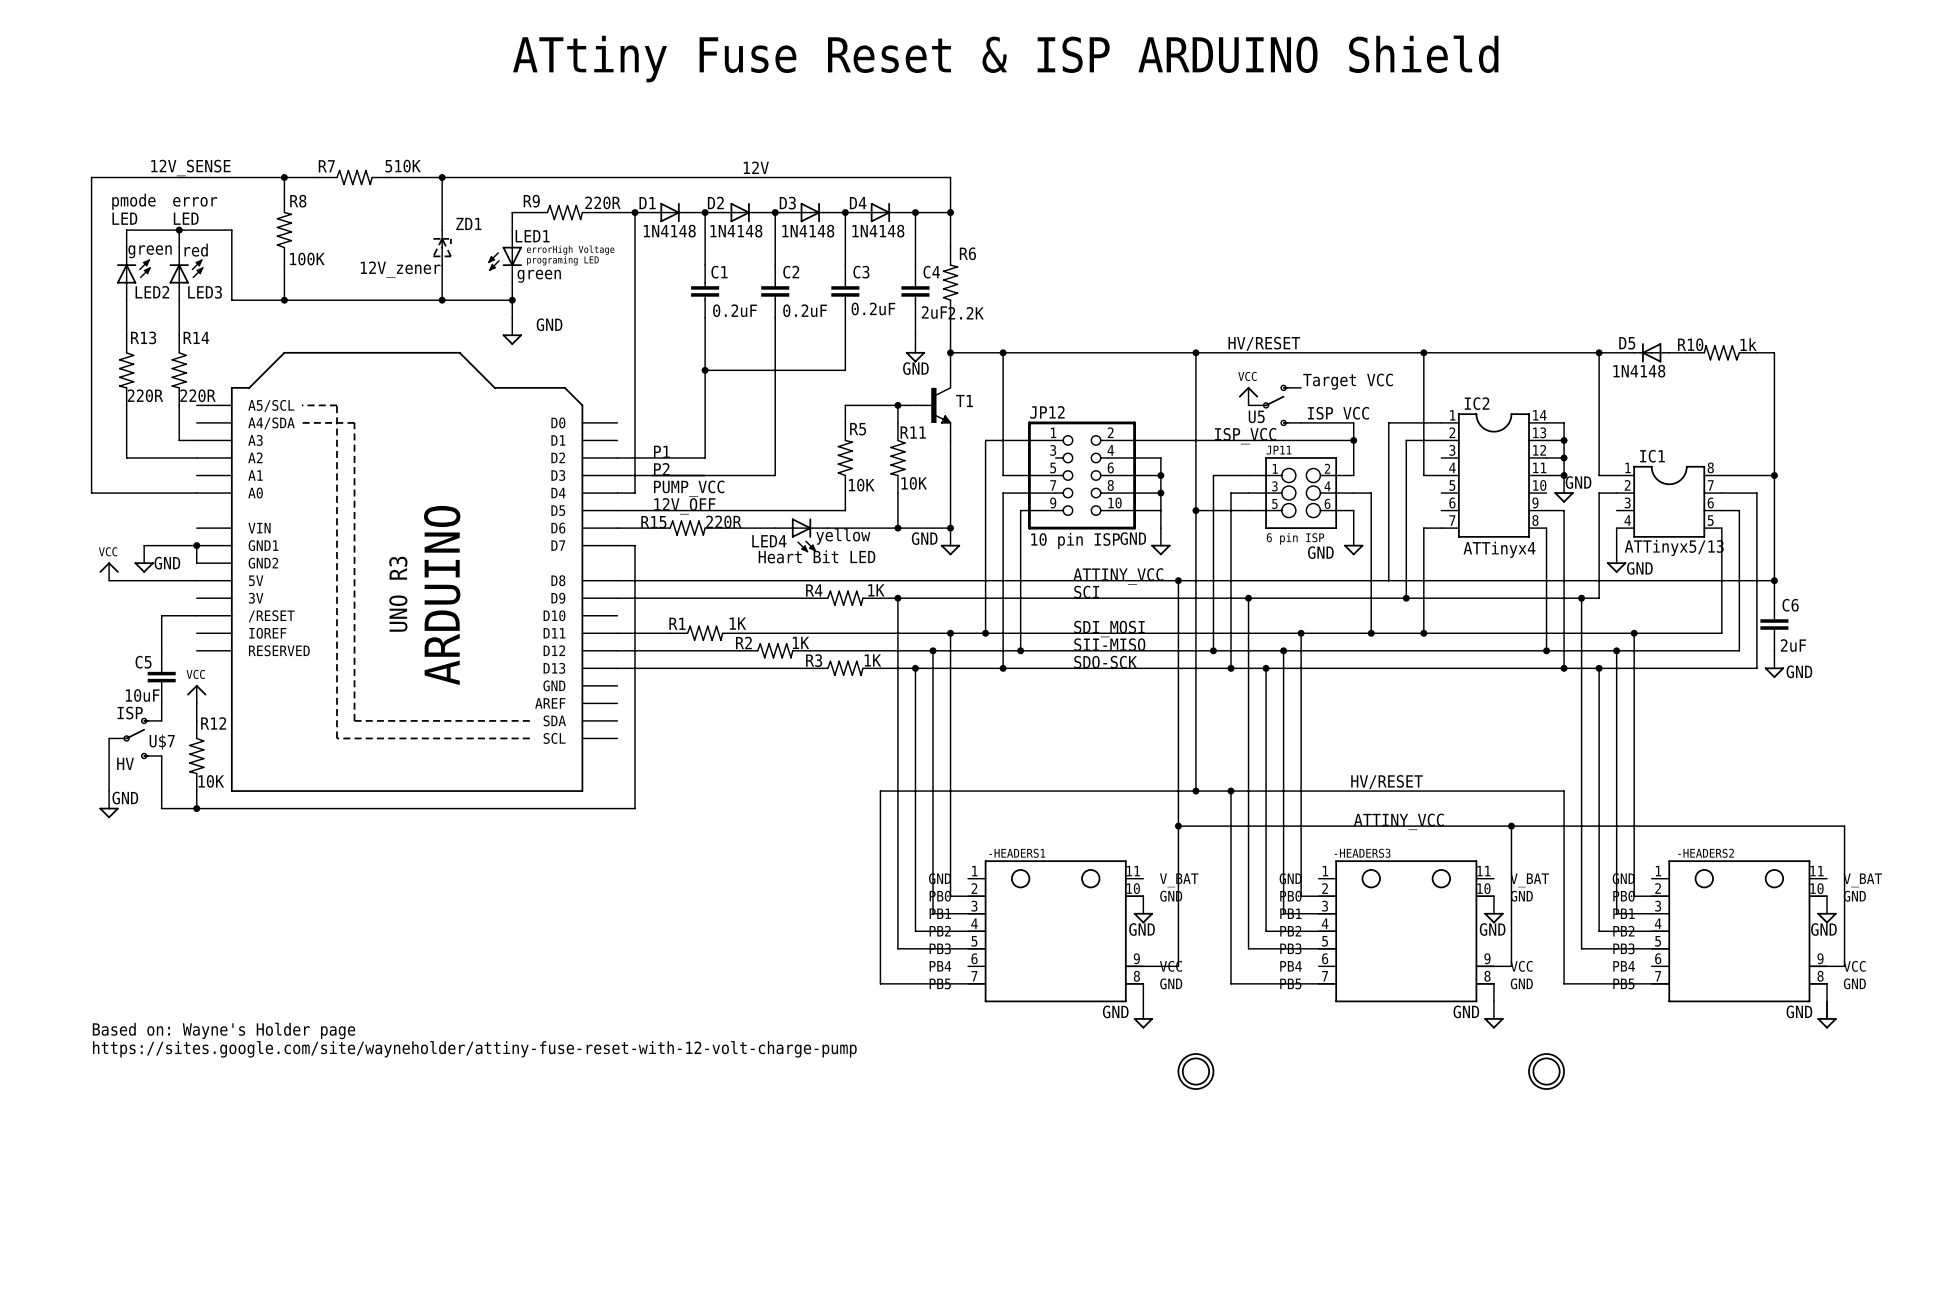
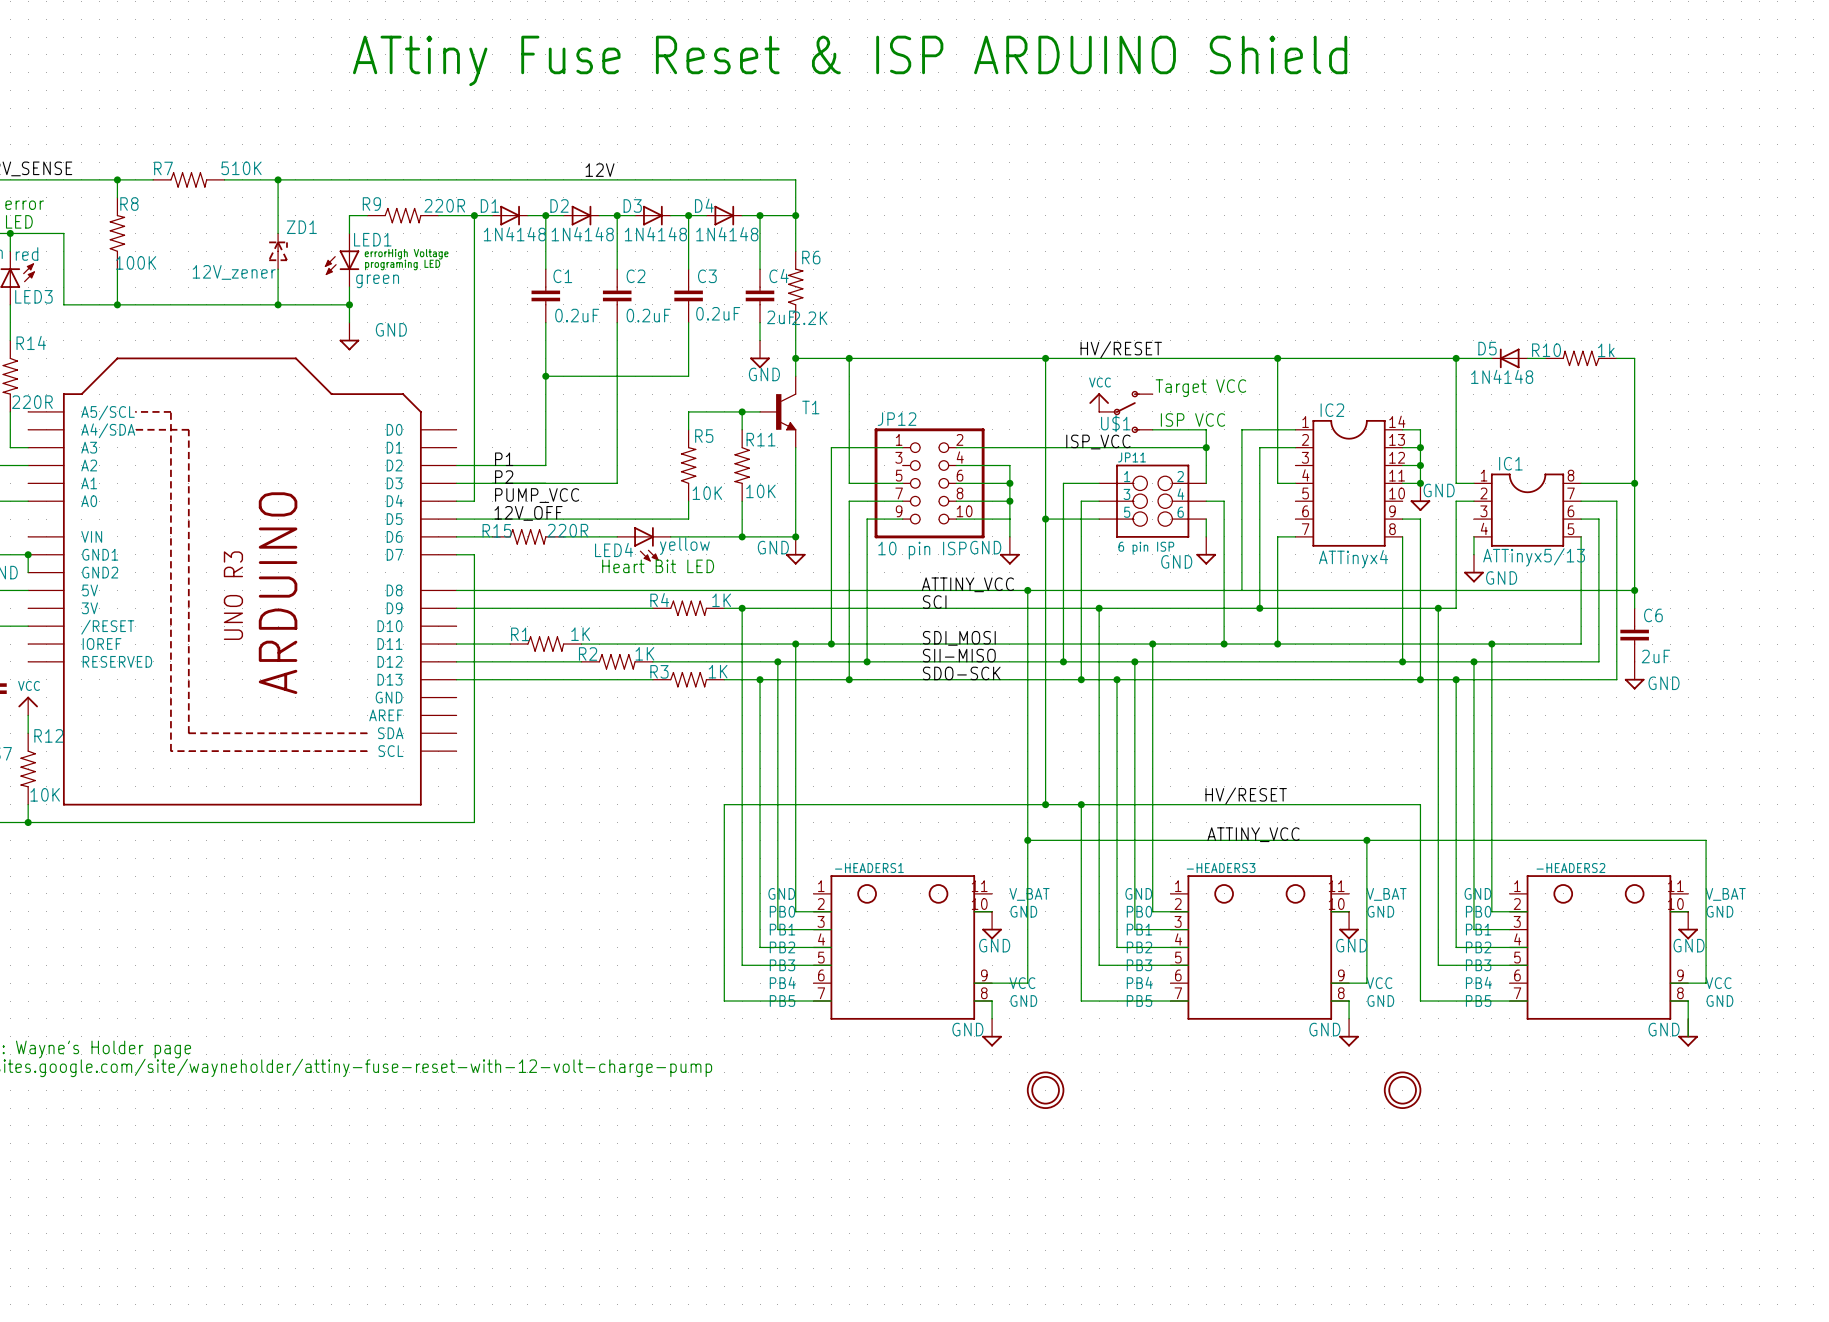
U5 name: U5 (1256, 416) -> U$1 (1115, 423)

